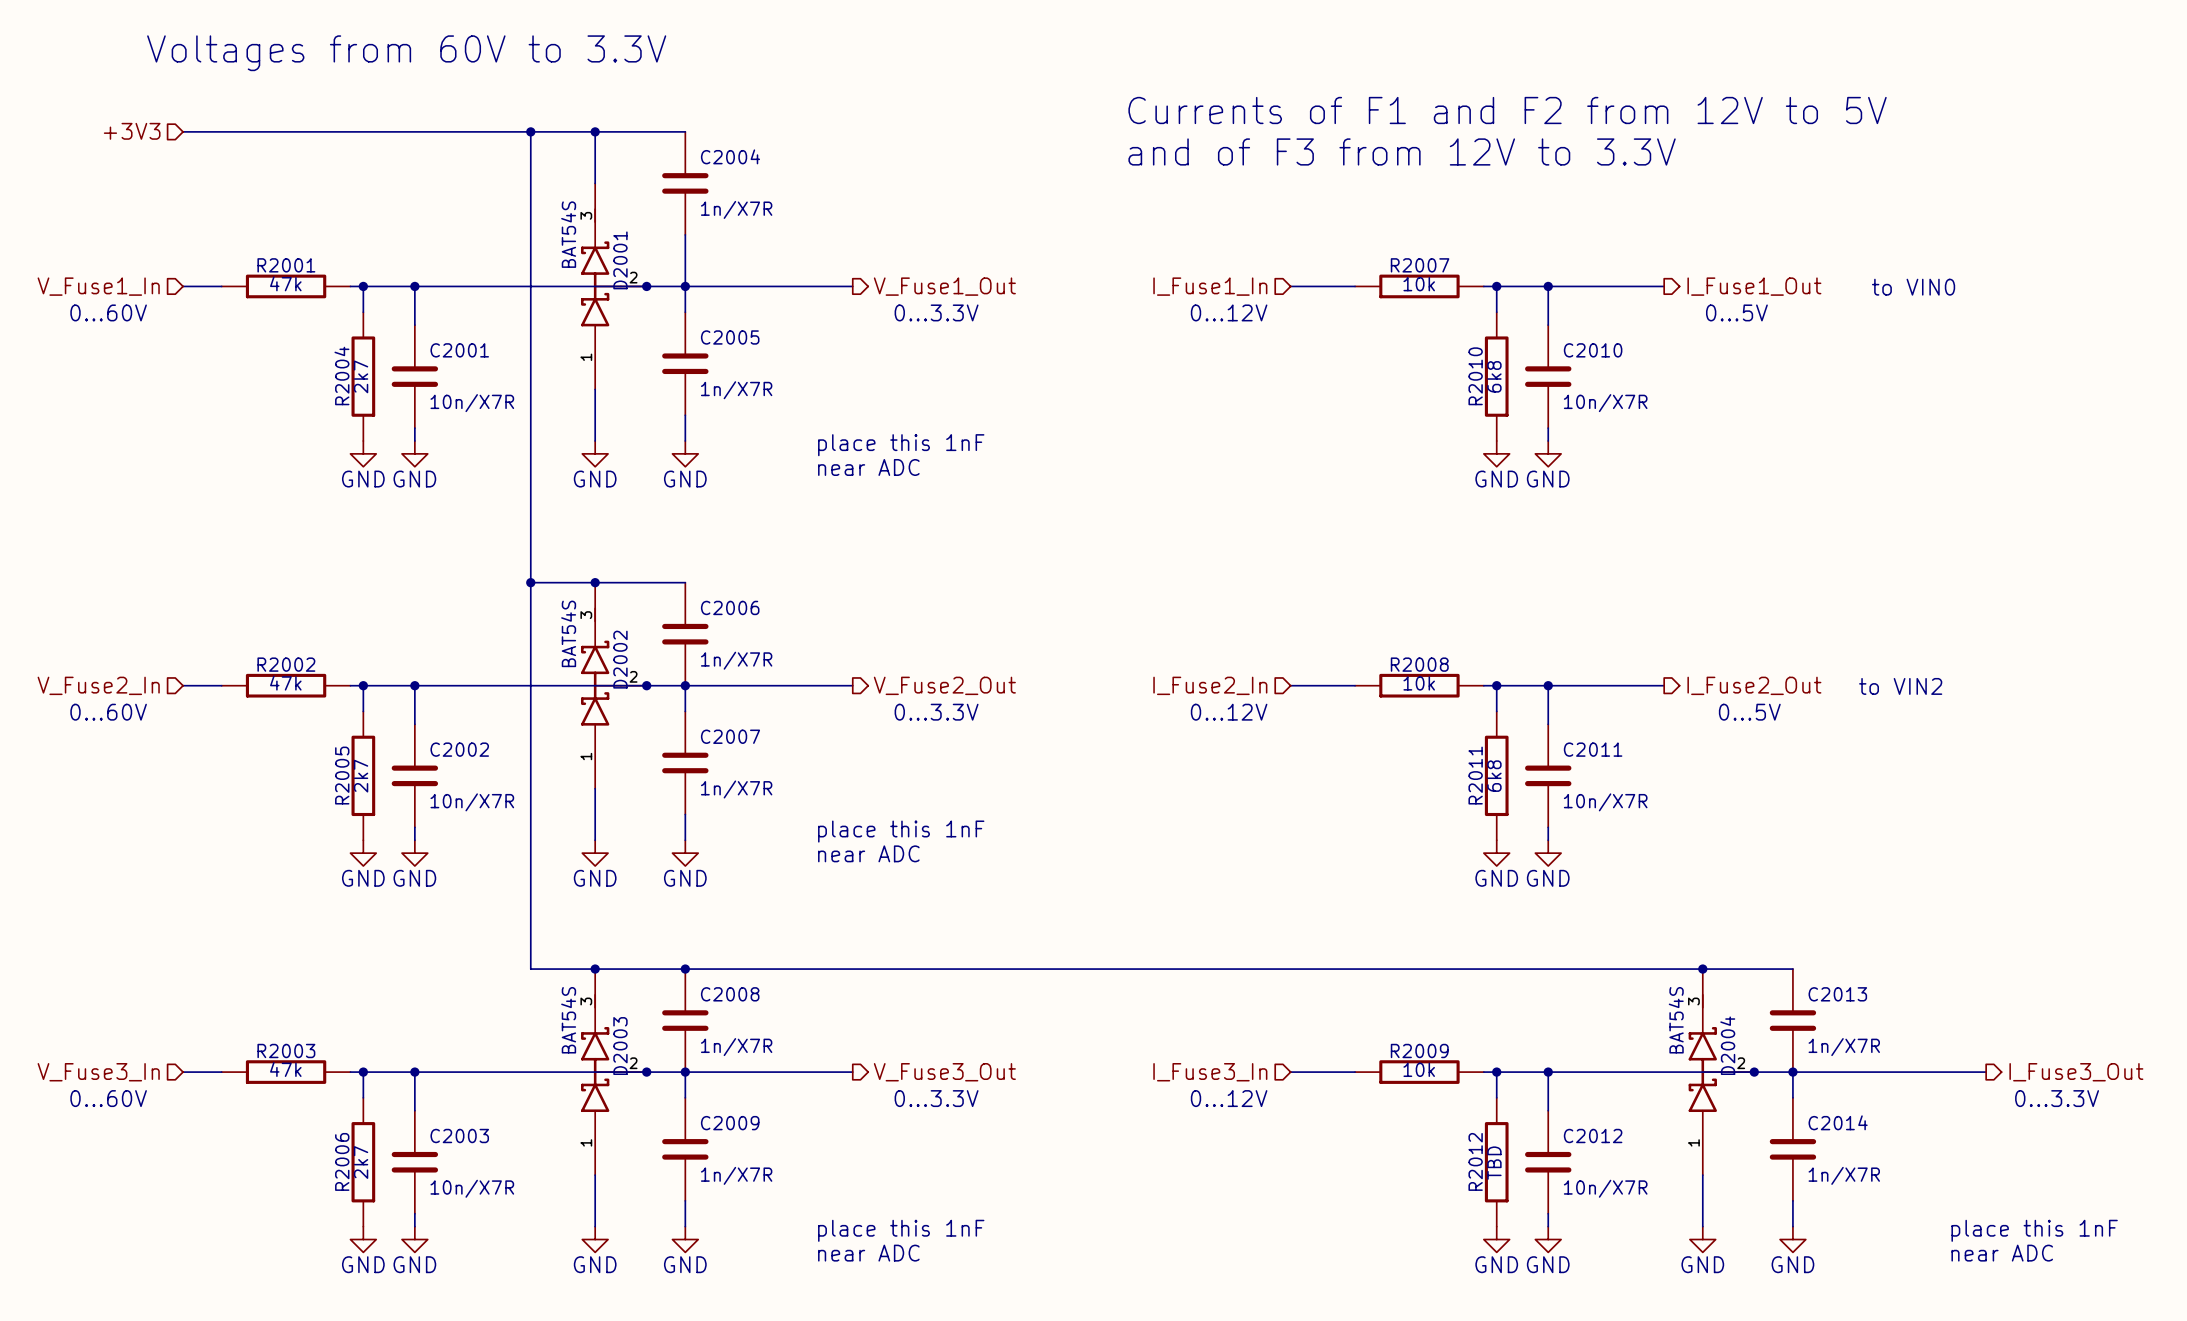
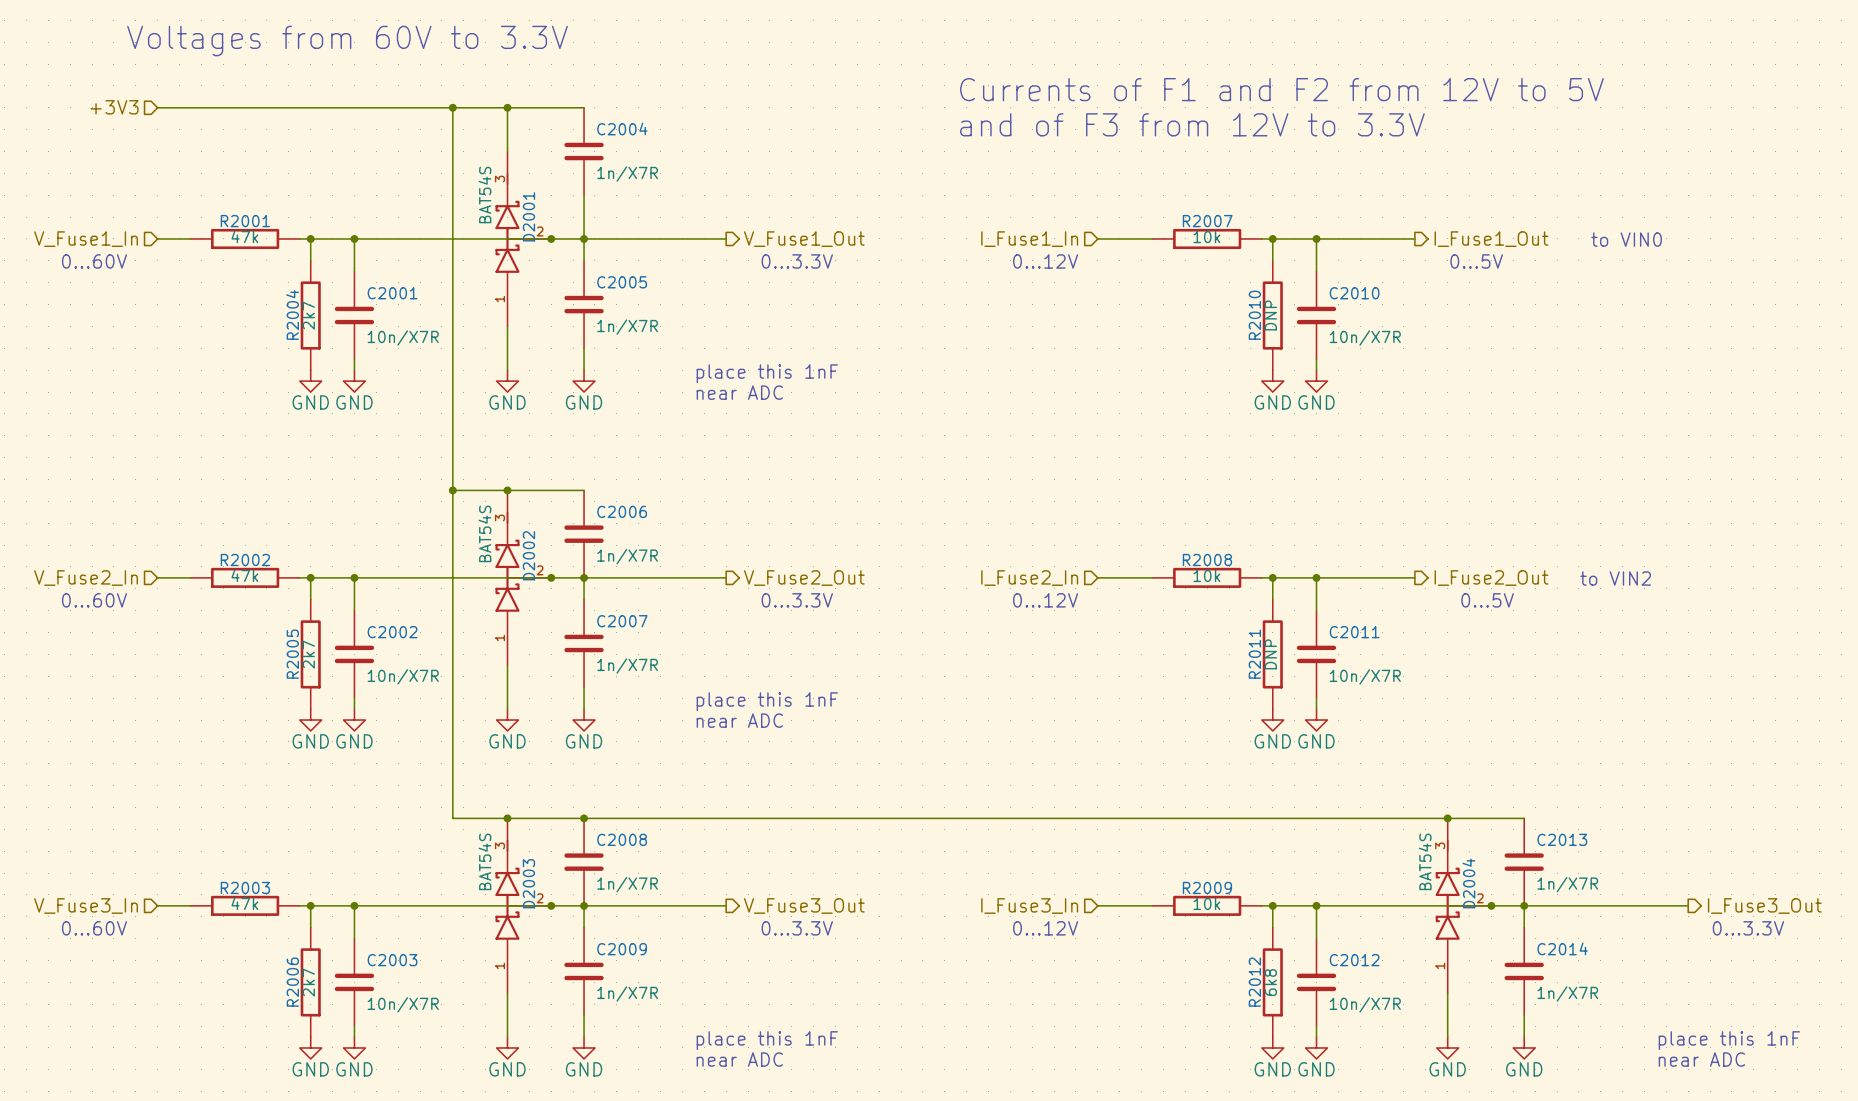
R2010 value: 6k8 (1494, 376) -> DNP (1270, 315)
R2011 value: 6k8 (1494, 776) -> DNP (1270, 654)
R2012 value: TBD (1494, 1163) -> 6k8 (1270, 982)

